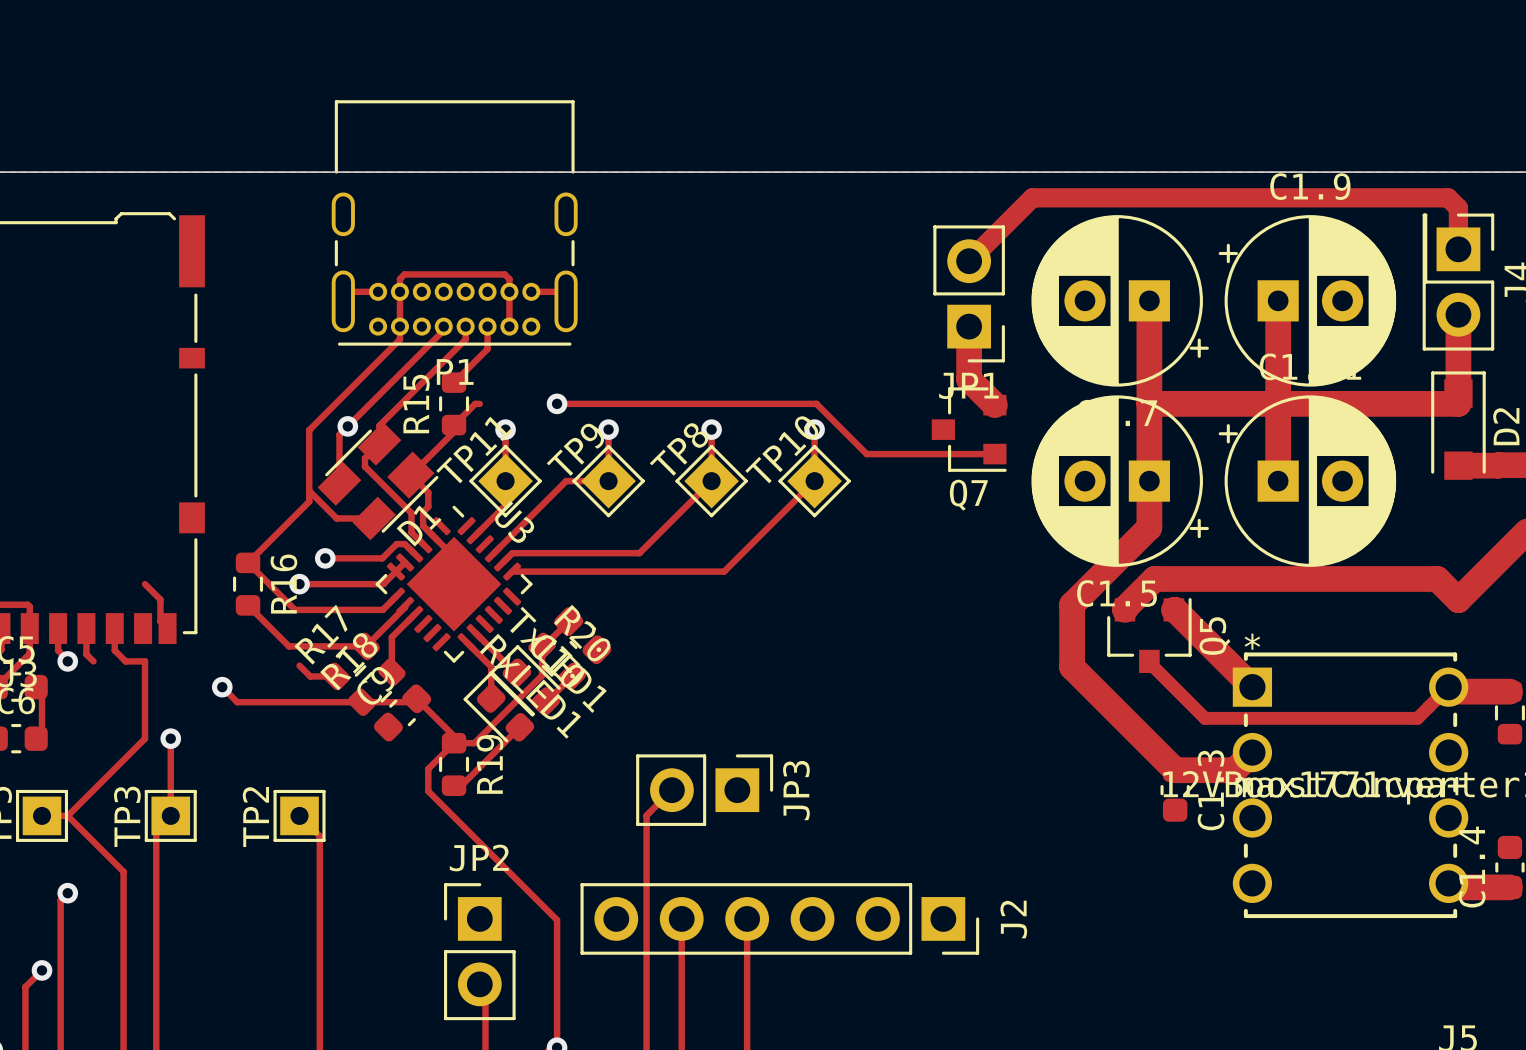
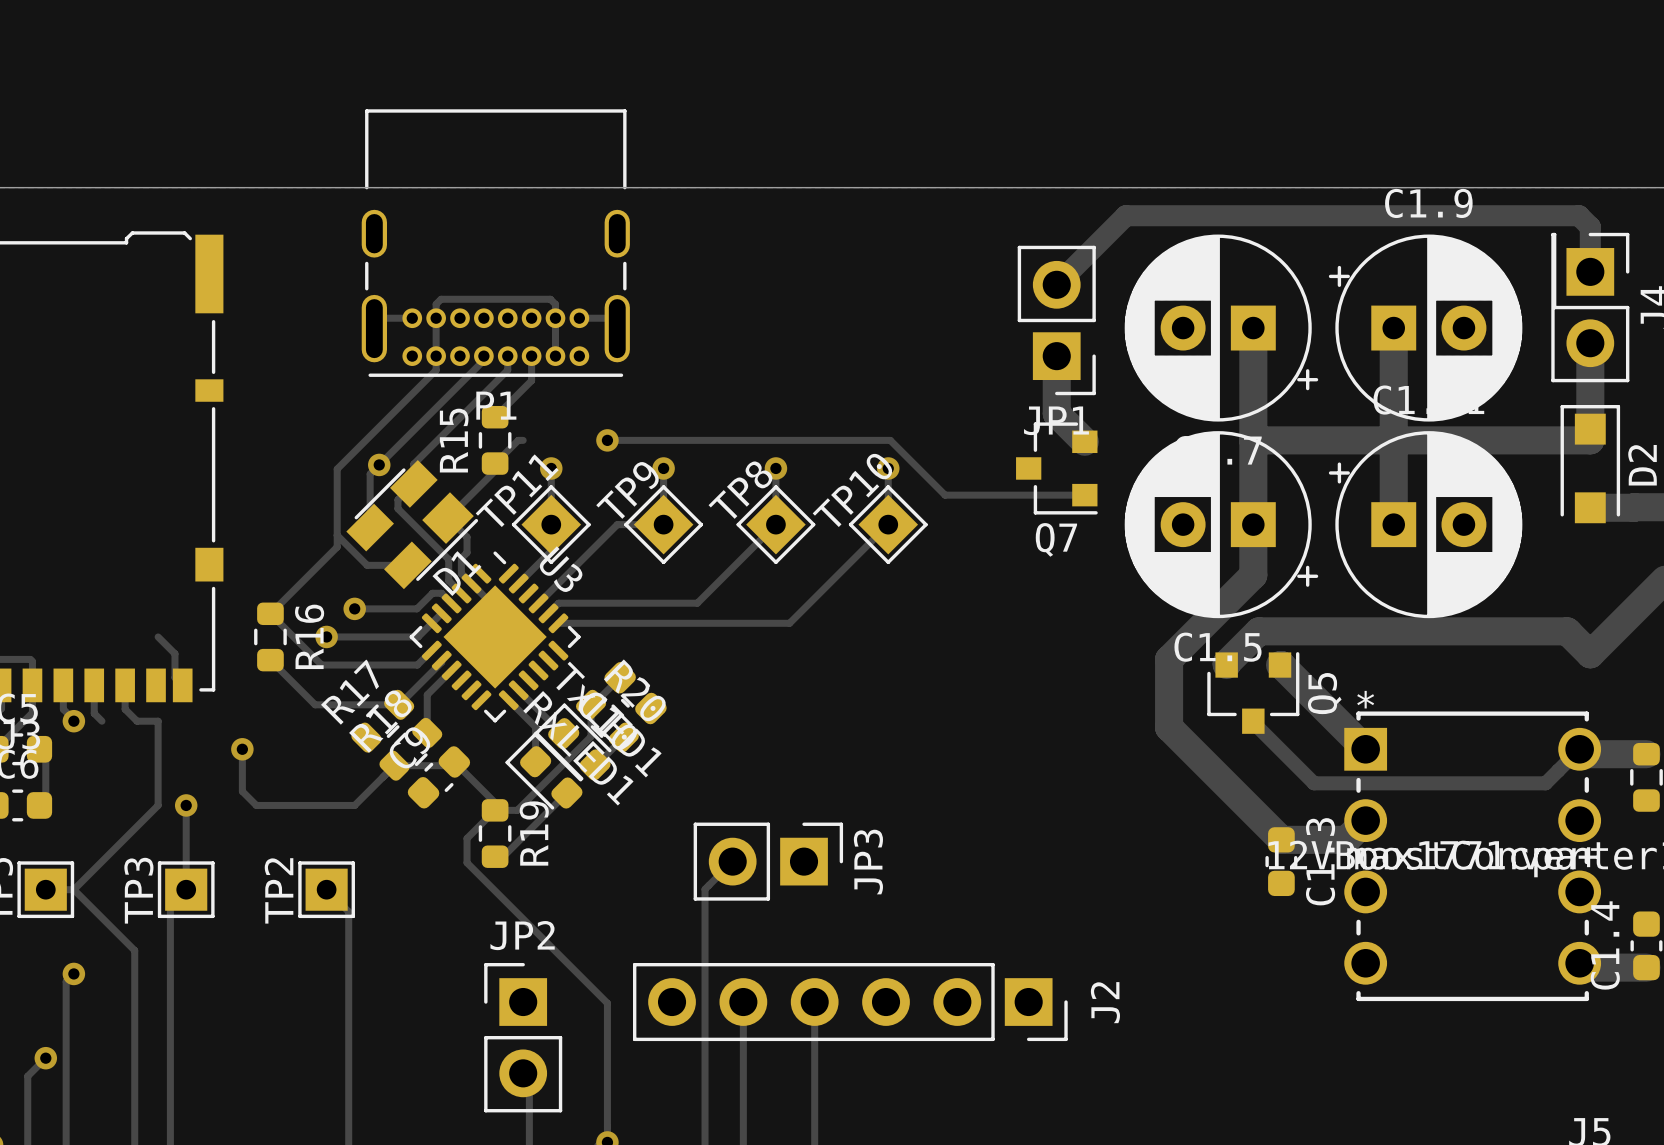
track: (299, 665) (310, 676) (336, 676) -> none
track: (222, 687) (237, 702) (361, 702) -> (242, 749) (242, 791) (256, 805) (354, 805) (394, 765)

